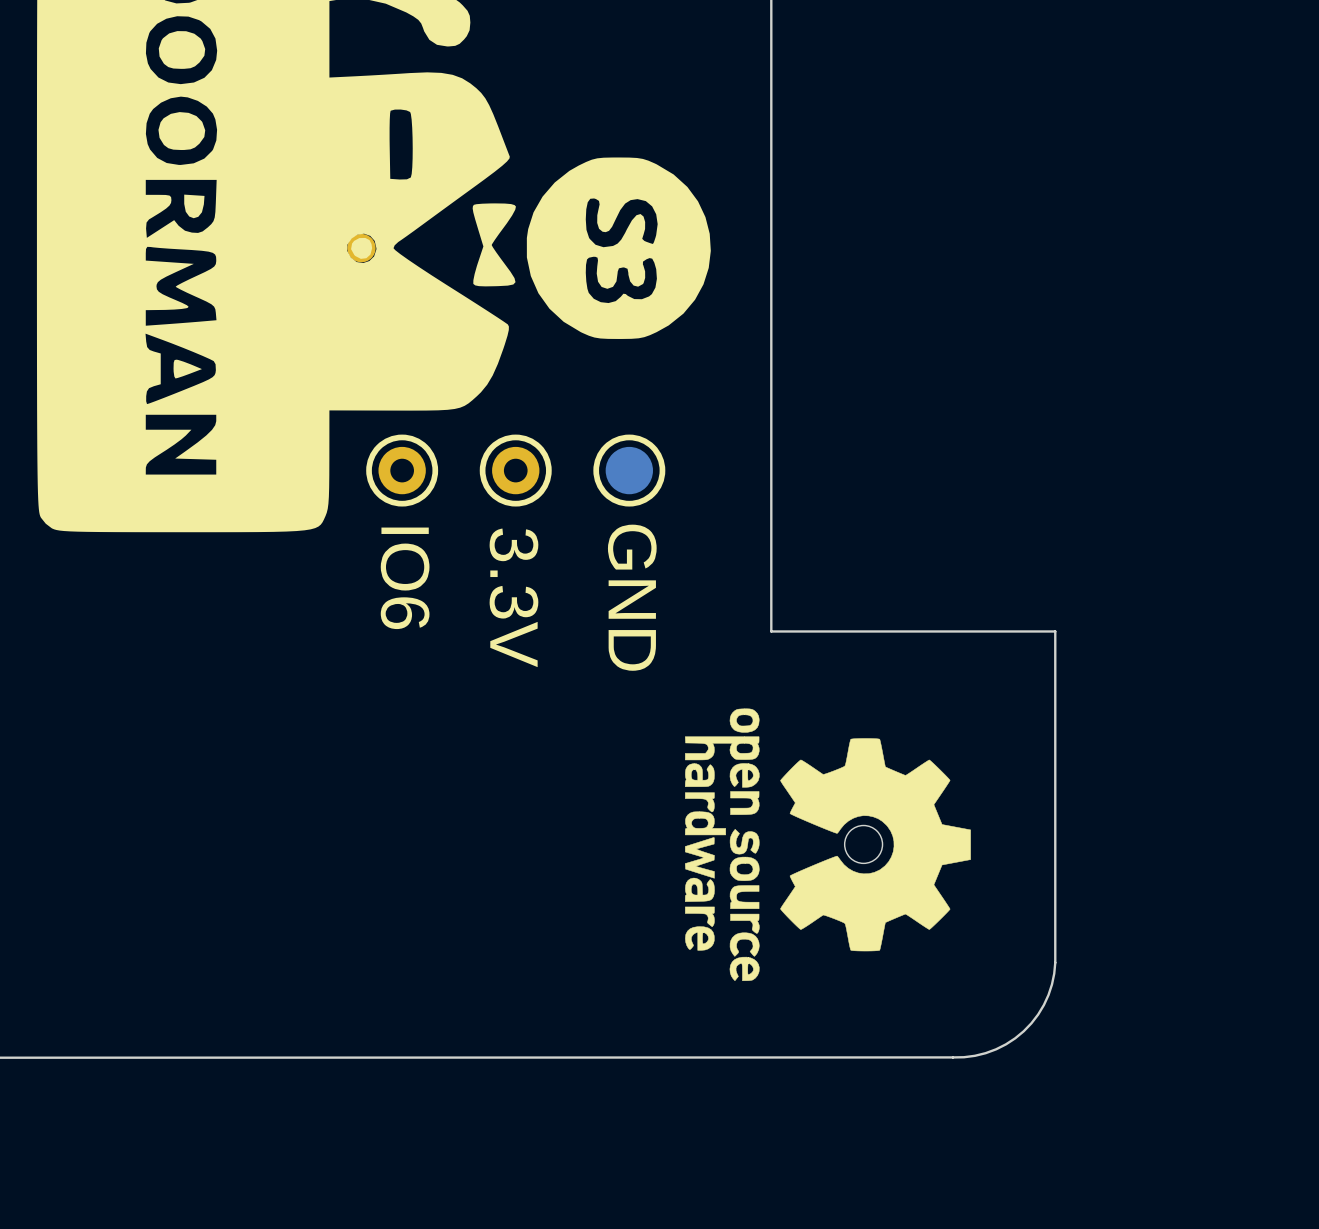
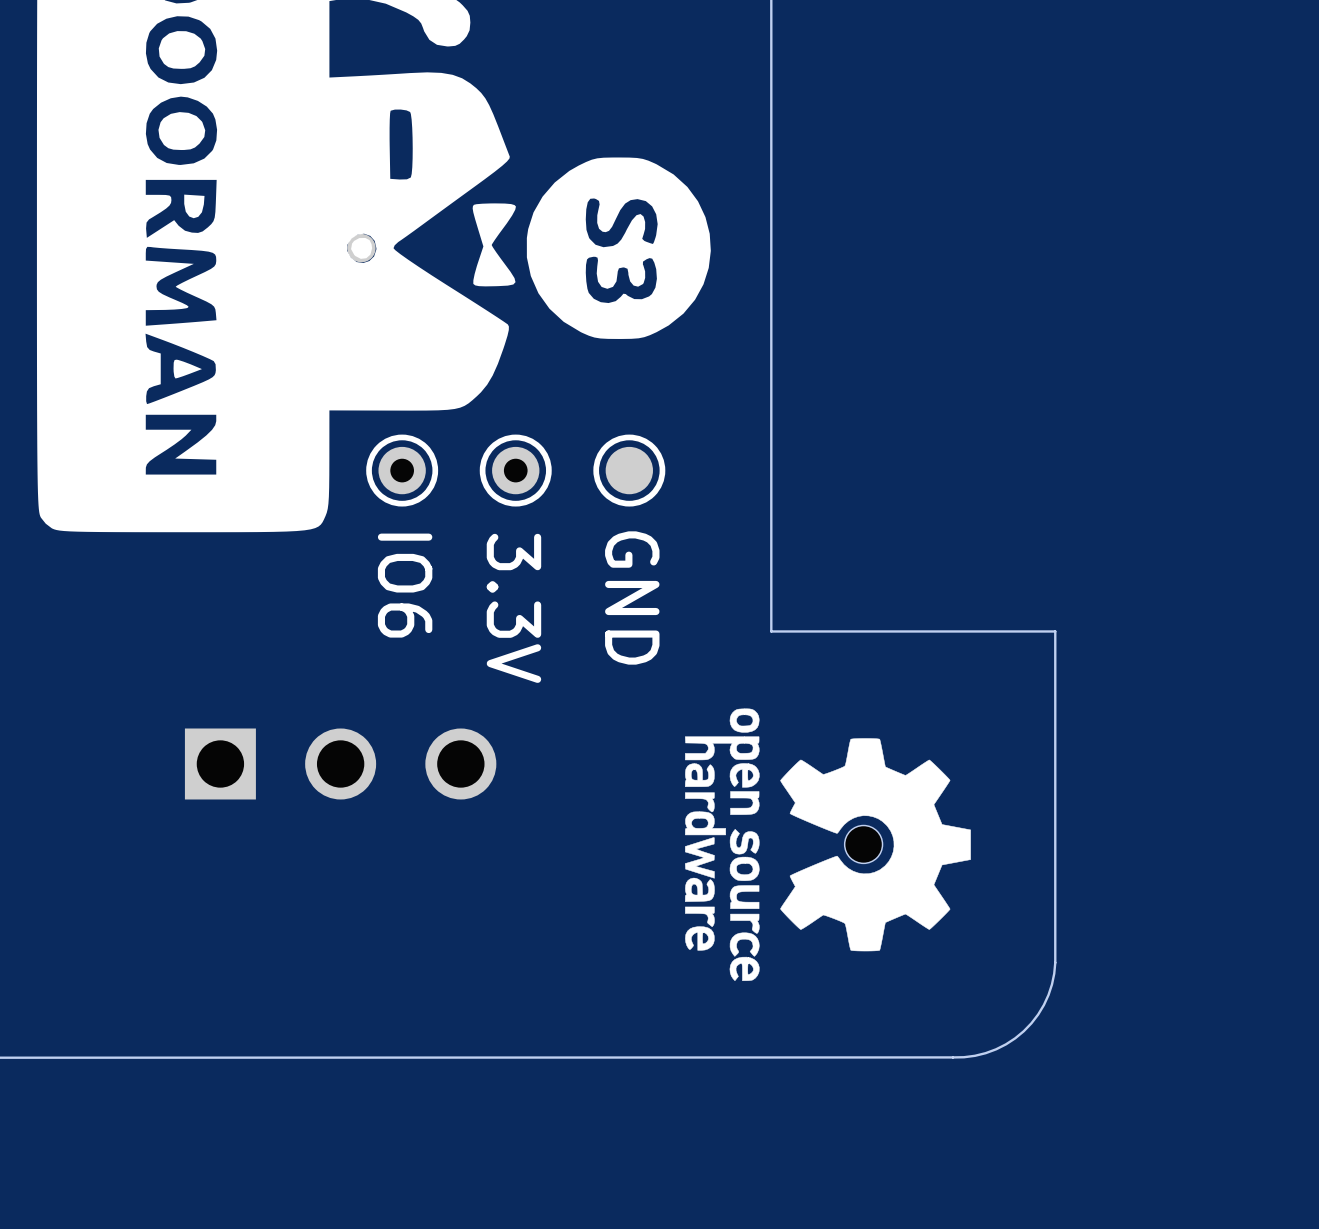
part: none -> (340, 763)

